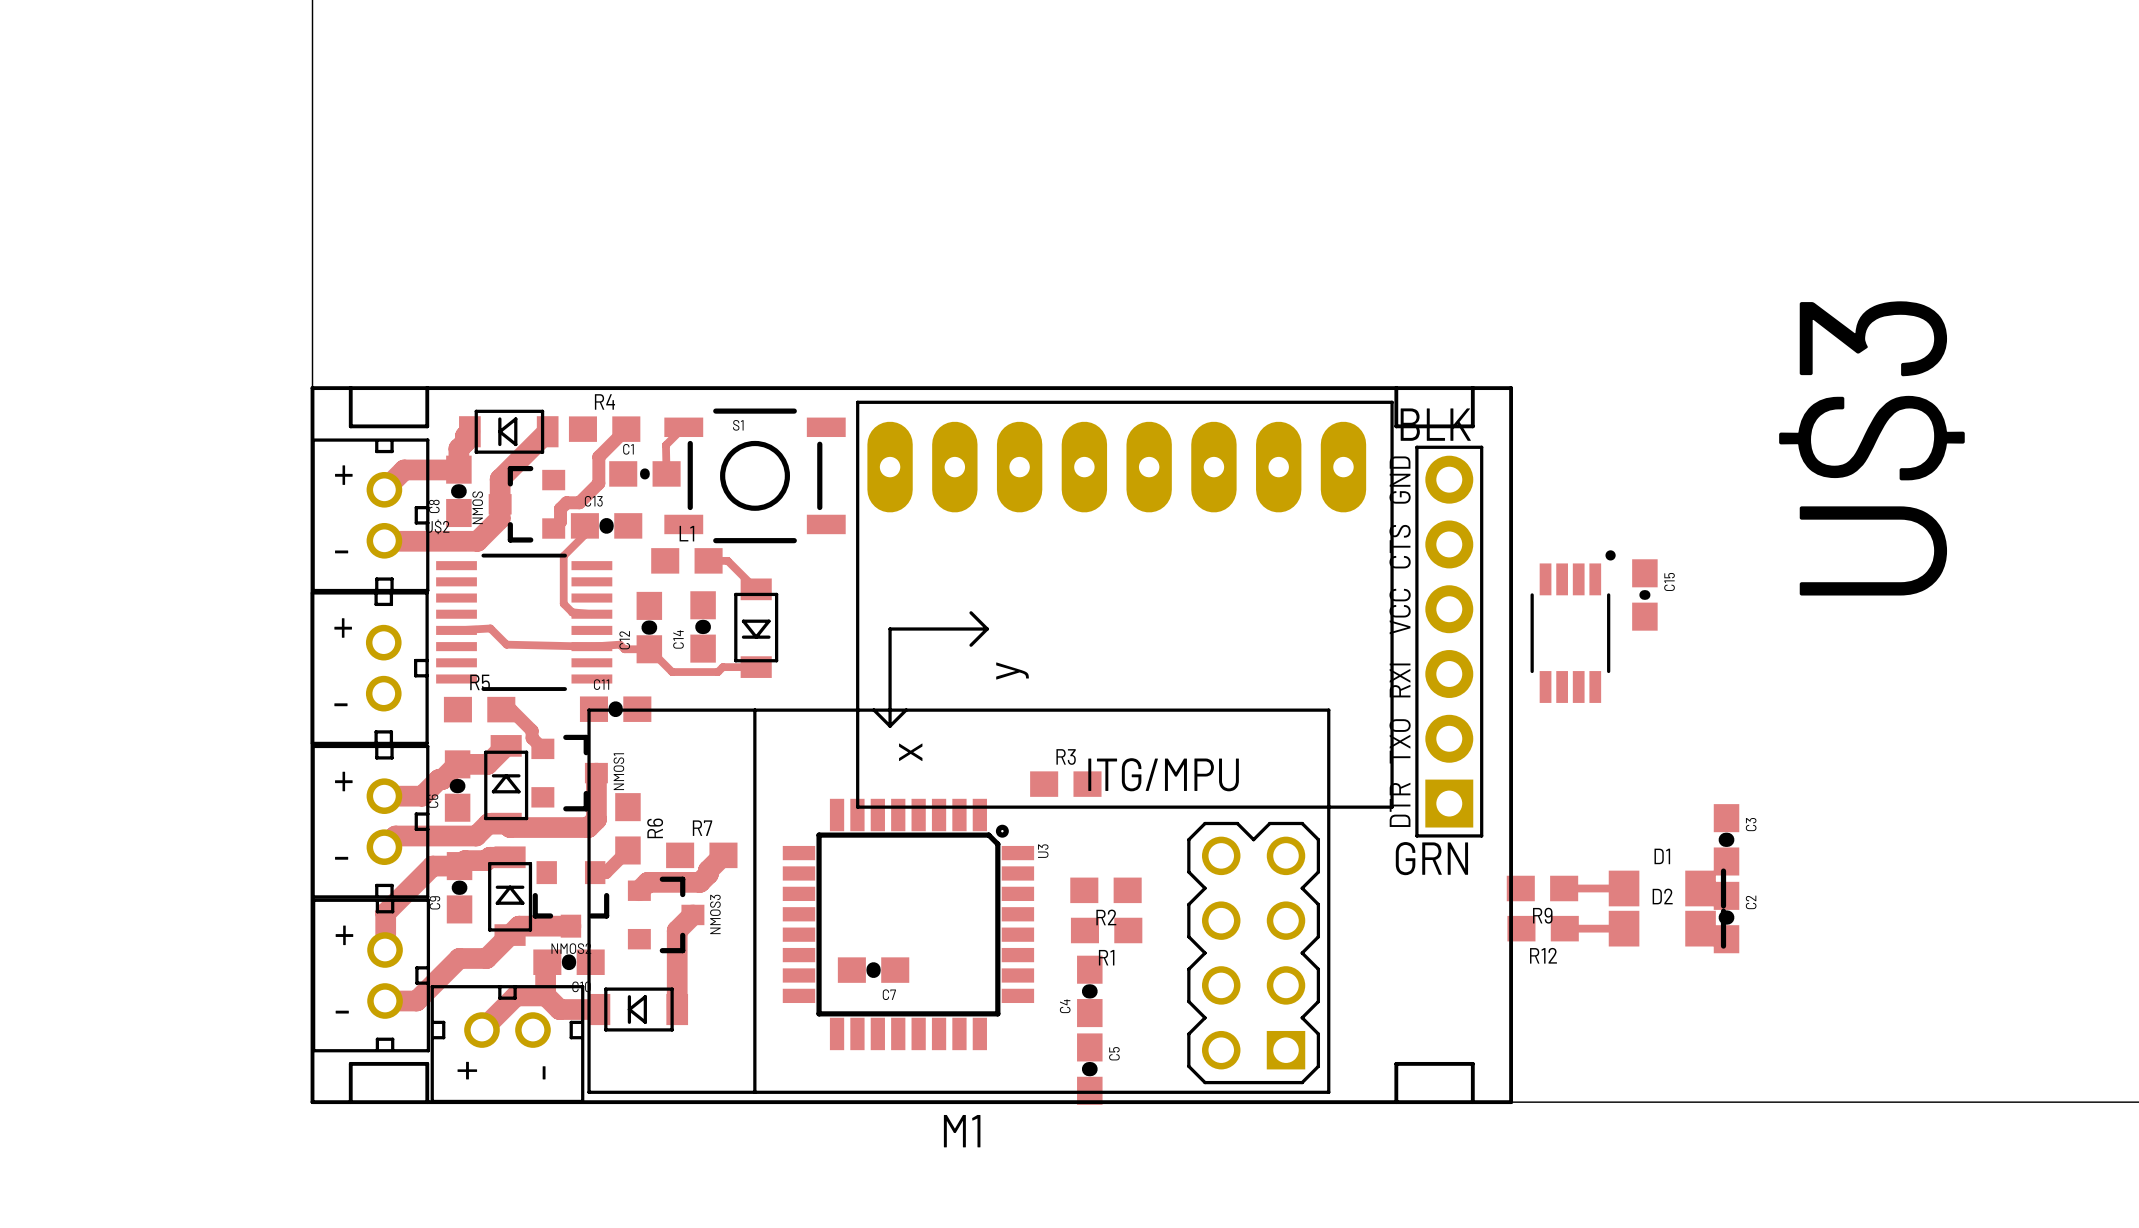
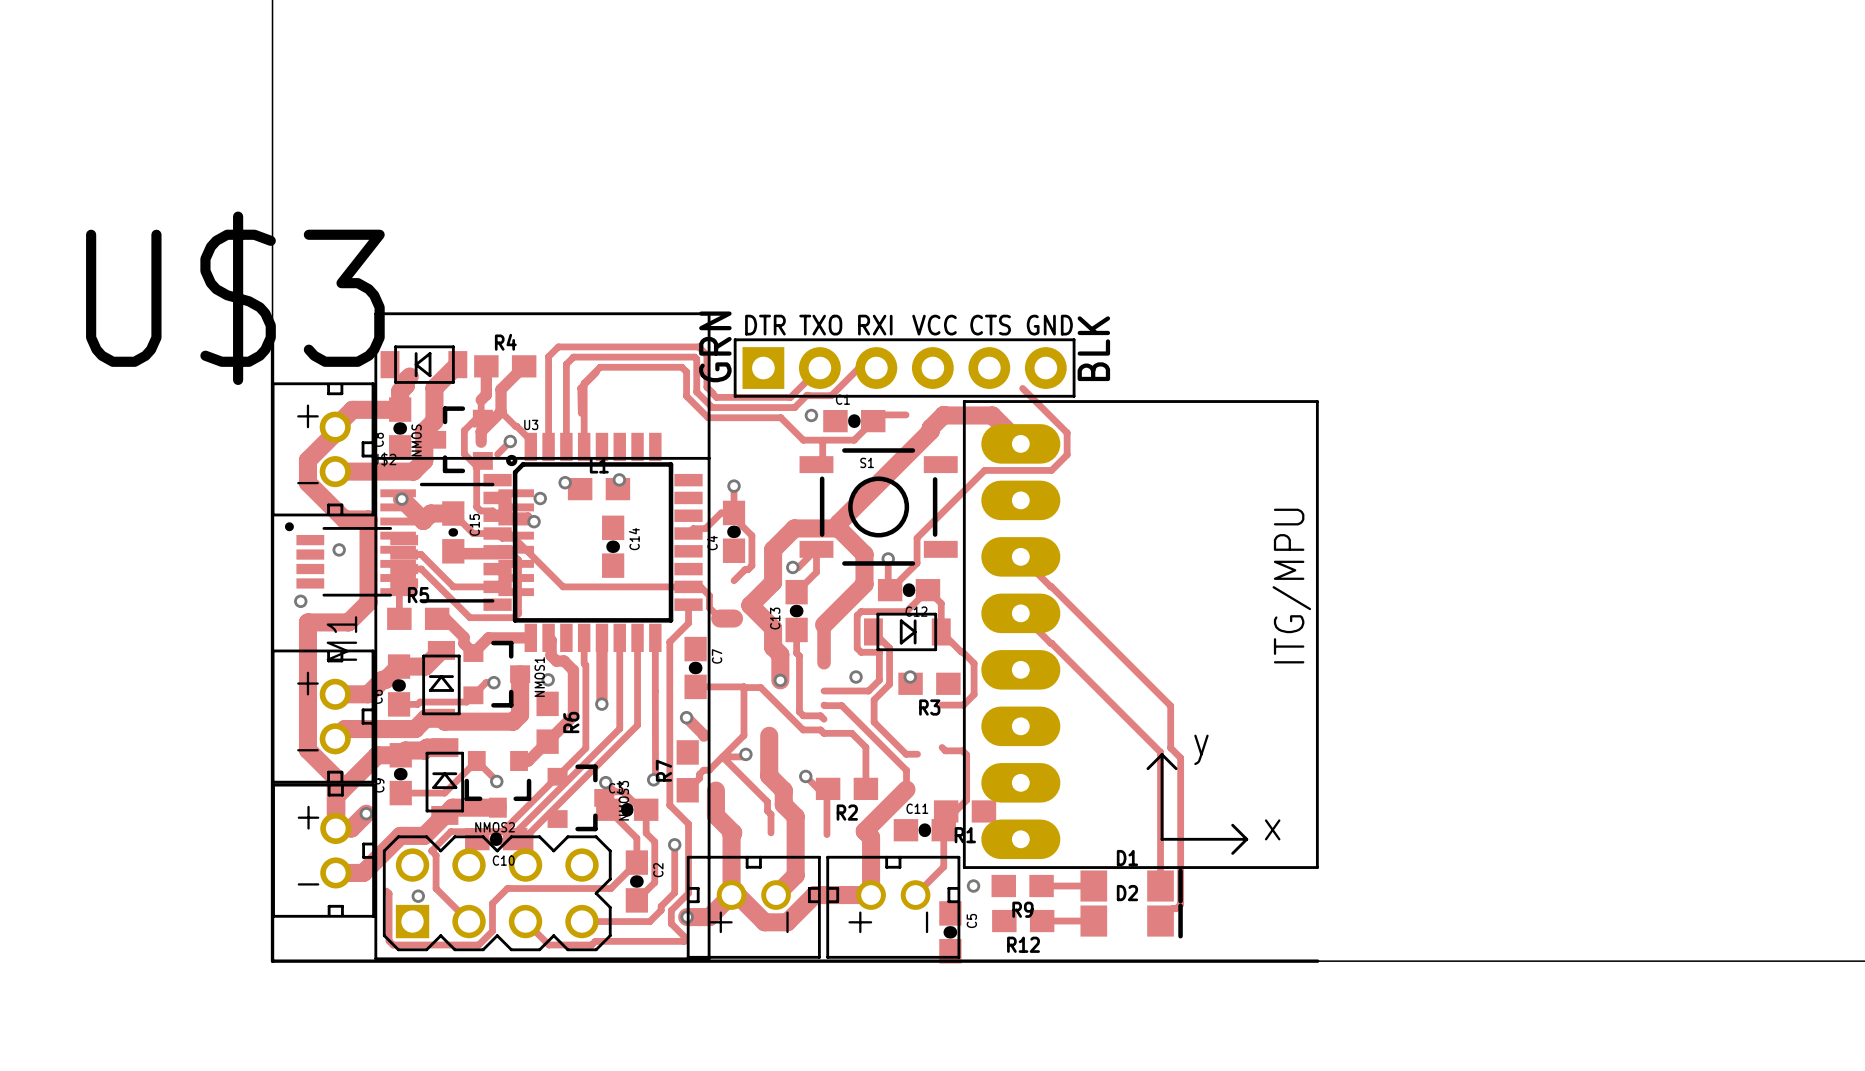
board edge: (312, 388) (1511, 388) (1511, 1102) -> none
board edge: (350, 388) (350, 426) (427, 426) (427, 388) -> none
board edge: (1396, 388) (1396, 426) (1472, 426) (1472, 388) -> none
track: none -> (486, 366) (486, 394) (481, 400) (481, 413) (464, 430) (464, 453) (476, 466) (476, 506) (480, 510) (492, 510) (497, 515) (528, 515) (534, 521)
track: none -> (524, 366) (501, 389) (501, 411)
track: none -> (819, 368) (790, 397) (716, 397) (706, 387) (706, 355) (698, 346) (558, 346) (548, 356) (548, 446)
track: none -> (876, 368) (859, 368) (831, 395) (807, 395) (794, 407) (712, 407) (696, 392) (696, 359) (694, 357) (573, 357) (566, 364) (566, 446)
part: none -> (904, 368)
R4 position: (604, 429) -> (505, 366)
track: (626, 429) (598, 456) (598, 483) (579, 502) (566, 502) (560, 508) (560, 521) (553, 528) -> none
part position: (508, 431) -> (423, 364)
track: (547, 431) (500, 479) (500, 518) (477, 541) (384, 540) -> (457, 364) (434, 388) (434, 421) (424, 431) (424, 460) (413, 471) (335, 471)
track: none -> (1022, 388) (1067, 432) (1067, 454) (1051, 470) (984, 470) (917, 538) (917, 563) (890, 590) (888, 588) (888, 558)
C1 footprint: [609, 461, 681, 487] -> [823, 410, 886, 433]
track: none -> (501, 411) (481, 431) (481, 442)
track: none -> (501, 411) (530, 440) (530, 446)
S1 position: (755, 475) -> (878, 506)
track: none -> (906, 414) (879, 414) (854, 440) (803, 440) (780, 417) (708, 417) (686, 396) (686, 371) (681, 367) (600, 367) (584, 383) (584, 446)
via: none -> (811, 415)
track: none -> (335, 427) (335, 433) (307, 460) (307, 482) (344, 519) (368, 519) (368, 602) (348, 622) (307, 622) (307, 750) (335, 777) (335, 828) (351, 828) (366, 813)
track: none -> (822, 440) (822, 458) (816, 464)
track: none -> (510, 441) (497, 454)
via: none -> (510, 441)
track: none -> (1020, 443) (992, 415) (943, 414) (930, 428) (930, 431) (838, 523) (838, 528)
track: (584, 525) (584, 534) (563, 555) (563, 603) (572, 612) (591, 614) -> none
C13 rotation: 0° (606, 525) -> 90° clockwise (796, 611)
C13 position: (606, 525) -> (796, 611)
via: none -> (619, 479)
via: none -> (565, 482)
track: none -> (734, 486) (734, 517) (751, 535) (751, 565) (734, 580)
via: none -> (734, 486)
track: (708, 560) (727, 560) (756, 589) -> none
via: none -> (540, 498)
track: none -> (401, 499) (423, 521) (430, 513) (453, 513) (473, 533) (497, 533) (502, 538) (514, 538) (563, 586) (700, 586) (709, 595) (709, 607) (720, 618) (734, 618)
via: none -> (401, 499)
track: none -> (734, 512) (721, 512) (705, 528) (693, 528) (688, 533)
C15 position: (1644, 594) -> (453, 532)
via: none -> (534, 521)
part: (1124, 604) -> none
track: none -> (838, 528) (864, 554) (864, 584) (824, 624) (824, 662)
track: none -> (838, 528) (794, 528) (773, 549) (773, 582) (750, 605) (773, 628) (773, 647) (780, 654) (780, 680)
U$3 rotation: 0° (1573, 626) -> 90° counterclockwise (351, 559)
U$3 position: (1573, 626) -> (351, 559)
C12 rotation: 0° (649, 627) -> 90° clockwise (909, 590)
C12 position: (649, 627) -> (909, 590)
part: (756, 628) -> none
via: none -> (339, 549)
track: (456, 630) (490, 628) (506, 644) (591, 646) (620, 644) (624, 649) (649, 649) (672, 672) (717, 672) (722, 667) (756, 667) -> none
track: none -> (497, 551) (453, 551) (458, 556) (514, 556) (518, 560) (518, 613) (514, 617) (469, 617) (421, 569) (404, 569) (404, 583) (399, 588) (399, 618)
track: none -> (404, 554) (421, 554) (453, 586) (497, 586)
track: none -> (1020, 556) (1170, 705) (1170, 748) (1180, 757) (1180, 904) (1176, 908) (1173, 908) (1160, 921)
C14 name position: C14 (678, 639) -> C14 (634, 539)
via: none -> (888, 558)
part: (1449, 641) -> none
track: none -> (792, 567) (798, 567) (816, 549) (816, 572) (796, 592)
via: none -> (792, 567)
part: (369, 668) -> none
via: none -> (300, 601)
track: none -> (688, 604) (688, 623) (669, 641) (669, 805) (688, 824) (688, 893) (671, 910) (671, 923) (684, 936) (684, 941) (595, 941) (591, 945) (548, 945) (525, 921)
track: none -> (1020, 613) (1160, 752) (1160, 886)
C11 position: (615, 709) -> (924, 830)
track: none -> (796, 629) (796, 653) (799, 655) (799, 711) (803, 715) (820, 715) (824, 719)
track: none -> (873, 631) (889, 648) (889, 684) (874, 699) (874, 722) (906, 754) (917, 754)
part: none -> (907, 631)
part: none -> (1140, 634)
track: none -> (530, 637) (488, 637) (473, 653)
track: none -> (548, 637) (551, 640) (551, 655) (556, 661) (564, 661) (573, 670) (573, 715) (547, 741)
track: none -> (584, 637) (585, 748) (502, 831) (450, 831) (431, 850) (436, 855) (436, 888) (469, 921)
track: none -> (601, 637) (601, 704)
track: none -> (619, 637) (619, 728) (506, 841) (469, 841) (469, 864)
track: none -> (637, 637) (637, 725) (530, 832) (530, 860) (525, 865)
track: none -> (655, 637) (655, 779) (653, 779)
R3 name position: R3 (1066, 756) -> R3 (929, 707)
via: none -> (856, 677)
via: none -> (910, 677)
via: none -> (548, 679)
via: none -> (780, 680)
track: none -> (493, 682) (486, 682) (466, 702) (419, 702) (417, 704) (399, 704)
via: none -> (493, 682)
track: none -> (695, 686) (743, 686)
track: none -> (743, 686) (760, 687) (803, 729) (820, 729) (824, 733) (851, 733) (865, 747) (865, 788)
track: none -> (743, 686) (743, 735) (709, 770) (703, 770) (699, 774) (699, 778) (687, 790)
track: none -> (824, 690) (868, 690)
track: none -> (868, 691) (879, 680) (879, 652) (861, 652) (857, 648) (857, 615) (861, 611) (906, 611) (927, 590) (941, 603) (941, 631) (974, 663) (974, 694) (963, 705) (942, 705)
via: none -> (601, 704)
track: none -> (824, 705) (841, 705) (906, 770) (906, 789) (864, 831) (871, 837) (871, 895) (814, 895) (787, 922) (764, 922) (737, 895) (731, 895)
track: none -> (686, 717) (703, 736)
via: none -> (686, 717)
C3 rotation: 0° (1726, 839) -> 90° clockwise (627, 809)
C3 position: (1726, 839) -> (627, 809)
track: none -> (769, 735) (769, 776) (783, 790) (783, 804) (795, 816) (795, 875) (776, 895)
R7 rotation: 0° (701, 855) -> 90° clockwise (687, 771)
R7 position: (701, 855) -> (687, 771)
track: (723, 855) (708, 870) (708, 874) (700, 882) (647, 882) (639, 890) -> none
track: none -> (942, 747) (945, 750) (962, 750) (966, 754) (966, 800) (943, 823) (943, 866) (915, 895)
track: none -> (745, 754) (743, 756) (722, 756) (767, 801) (767, 810) (771, 814) (771, 832)
via: none -> (745, 754)
R9 position: (1542, 888) -> (1022, 886)
track: (1564, 888) (1624, 888) -> (1041, 886) (1093, 886)
D1 position: (1667, 888) -> (1131, 886)
track: none -> (805, 776) (818, 788) (828, 788) (826, 834)
via: none -> (805, 776)
R2 position: (1105, 890) -> (847, 788)
via: none -> (653, 779)
track: none -> (496, 781) (476, 760) (444, 793) (400, 793)
via: none -> (496, 781)
track: none -> (605, 782) (615, 791) (623, 791) (641, 809) (646, 809) (646, 833) (654, 841) (654, 882) (636, 900)
via: none -> (605, 782)
M1 rotation: 0° (958, 901) -> 90° clockwise (542, 636)
track: none -> (715, 790) (715, 815) (733, 832) (731, 834) (731, 895)
track: (692, 914) (677, 930) (677, 1009) -> none
C2 position: (1726, 917) -> (636, 881)
U3 rotation: 0° (908, 924) -> 90° counterclockwise (593, 542)
U3 position: (908, 924) -> (593, 542)
track: none -> (608, 809) (636, 838) (636, 862) (610, 888) (507, 888) (492, 903) (492, 931) (478, 945) (393, 945) (389, 941) (389, 893) (386, 891)
R12 position: (1543, 928) -> (1023, 921)
track: (1564, 928) (1624, 928) -> (1042, 921) (1093, 921)
D2 position: (1667, 928) -> (1131, 921)
via: none -> (366, 813)
track: (547, 962) (545, 963) (545, 995) (559, 1009) (599, 1009) -> none
track: none -> (674, 844) (674, 892) (649, 921) (582, 921)
via: none -> (674, 844)
C7 rotation: 0° (873, 970) -> 90° clockwise (695, 667)
C7 position: (873, 970) -> (695, 667)
C4 position: (1089, 991) -> (734, 531)
track: (545, 995) (516, 995) (481, 1030) -> none
part: (638, 1009) -> none
via: none -> (973, 886)
track: none -> (731, 895) (709, 917) (687, 917)
via: none -> (418, 896)
part: none -> (753, 907)
part: none -> (893, 907)
part: (507, 1044) -> none
via: none -> (687, 917)
board edge: (350, 1102) (350, 1063) (427, 1063) (427, 1102) -> none
board edge: (1396, 1102) (1396, 1063) (1472, 1063) (1472, 1102) -> none

